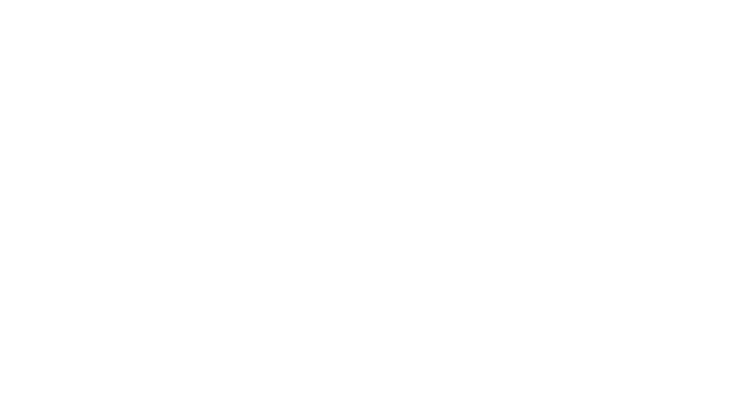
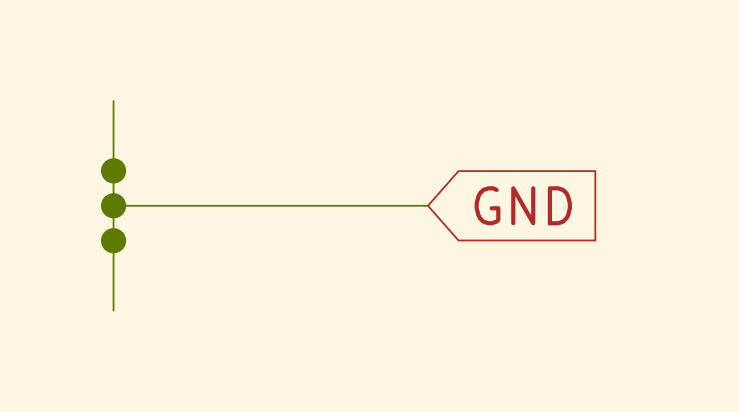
wire: none -> (113, 100) (113, 310)
junction: none -> (113, 170)
wire: none -> (113, 205) (427, 205)
junction: none -> (113, 205)
global label: none -> GND (523, 205)
junction: none -> (113, 240)

